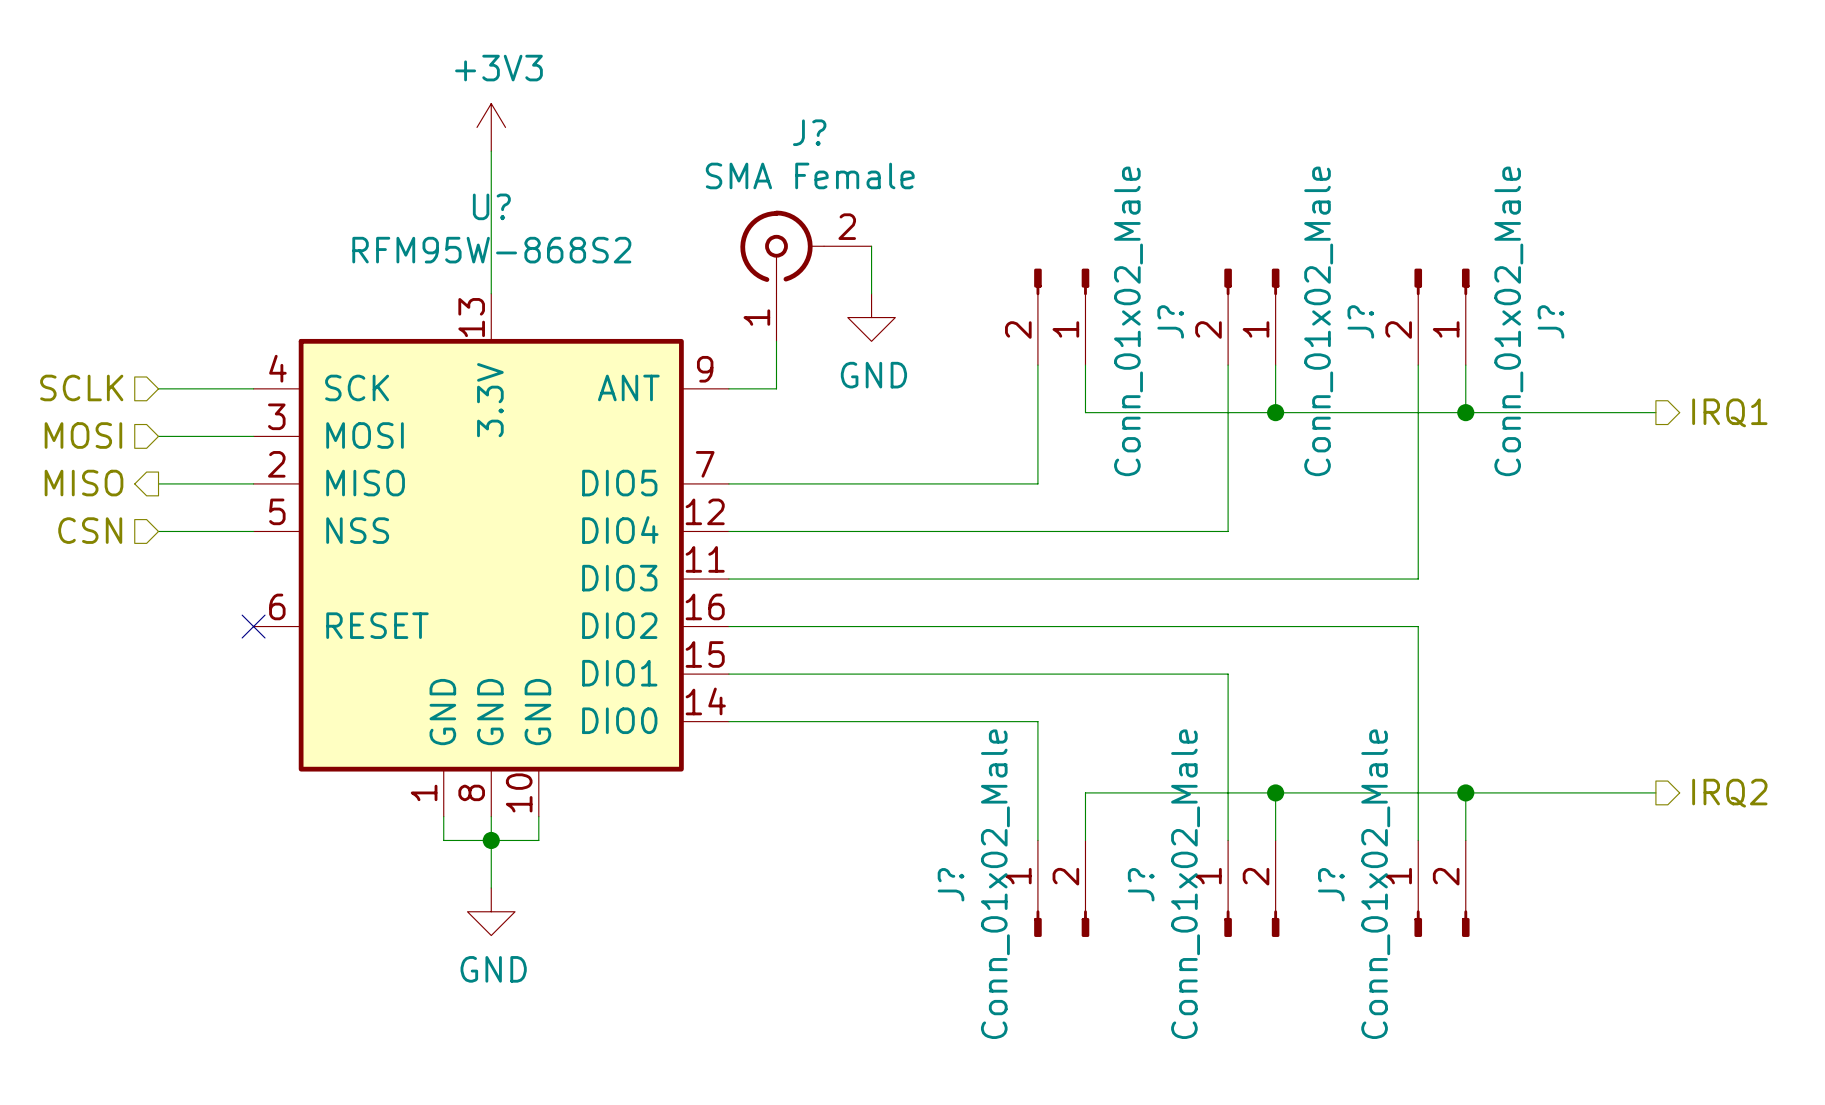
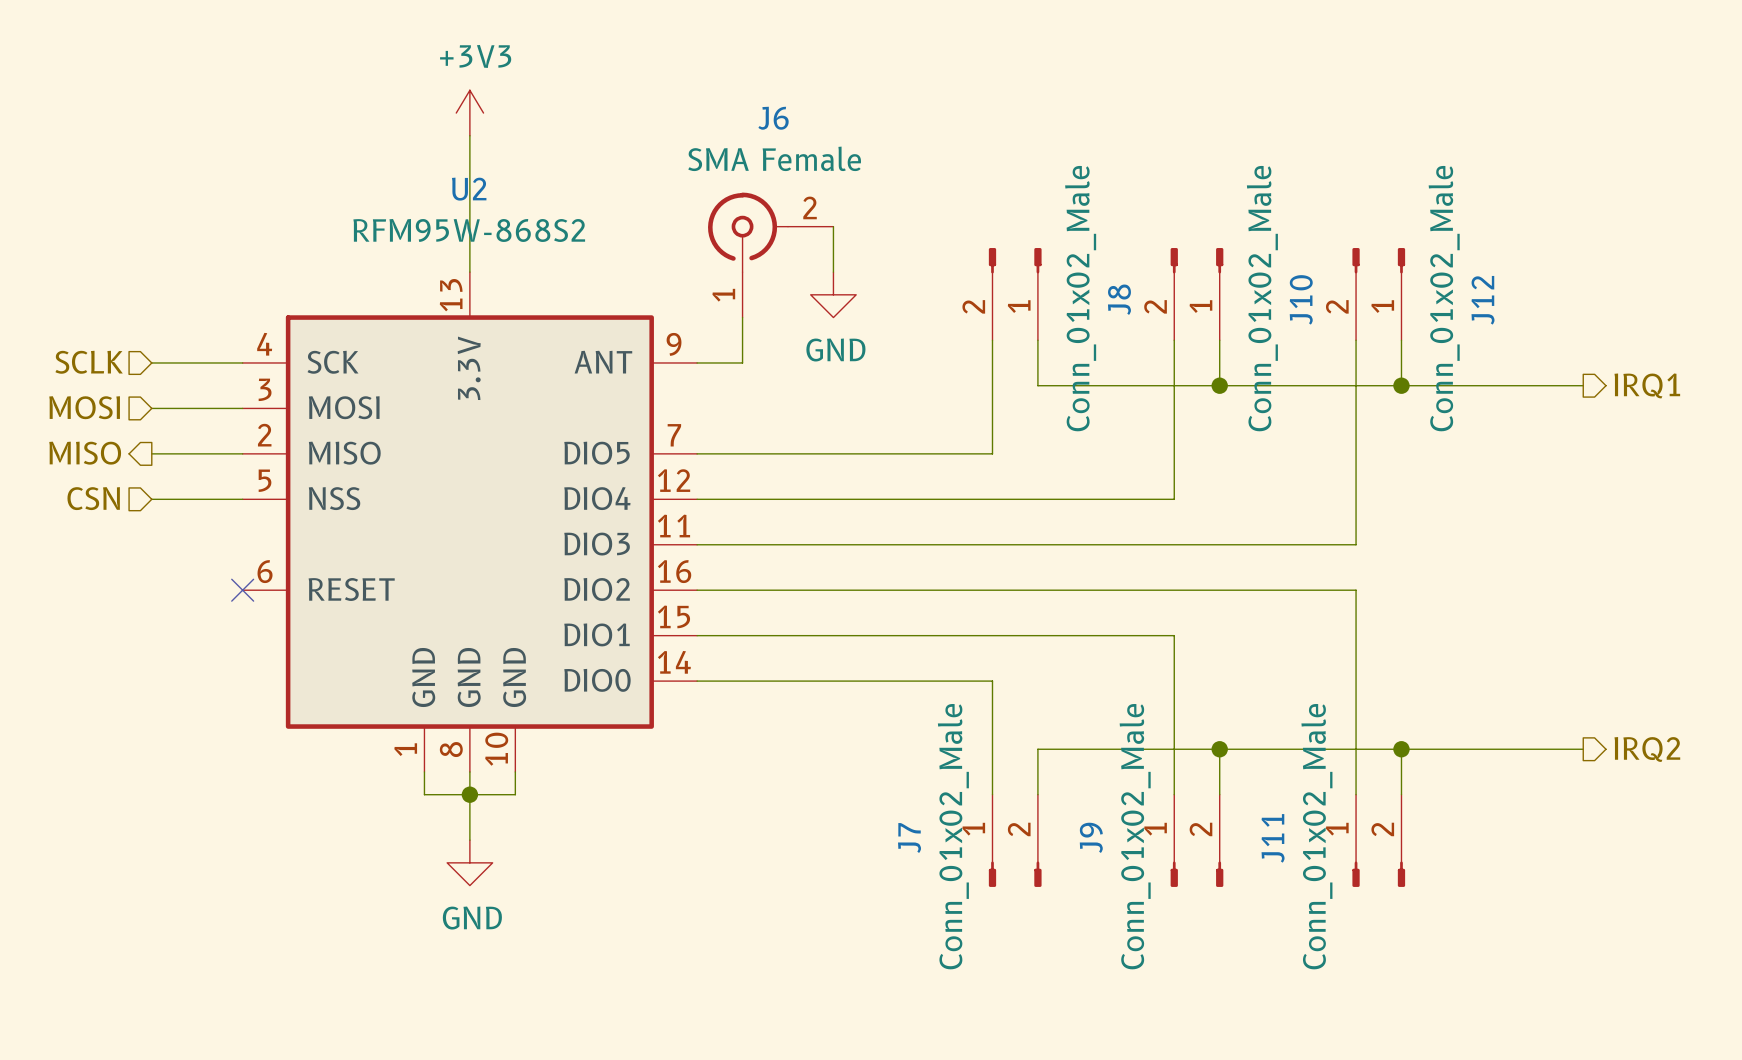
J? name: J? (809, 132) -> J6 (773, 118)
U? name: U? (491, 206) -> U2 (469, 189)
J? name: J? (1170, 321) -> J8 (1119, 299)
J? name: J? (1360, 321) -> J10 (1301, 299)
J? name: J? (1550, 321) -> J12 (1483, 300)
J? name: J? (951, 884) -> J7 (909, 838)
J? name: J? (1141, 884) -> J9 (1091, 837)
J? name: J? (1331, 884) -> J11 (1273, 838)

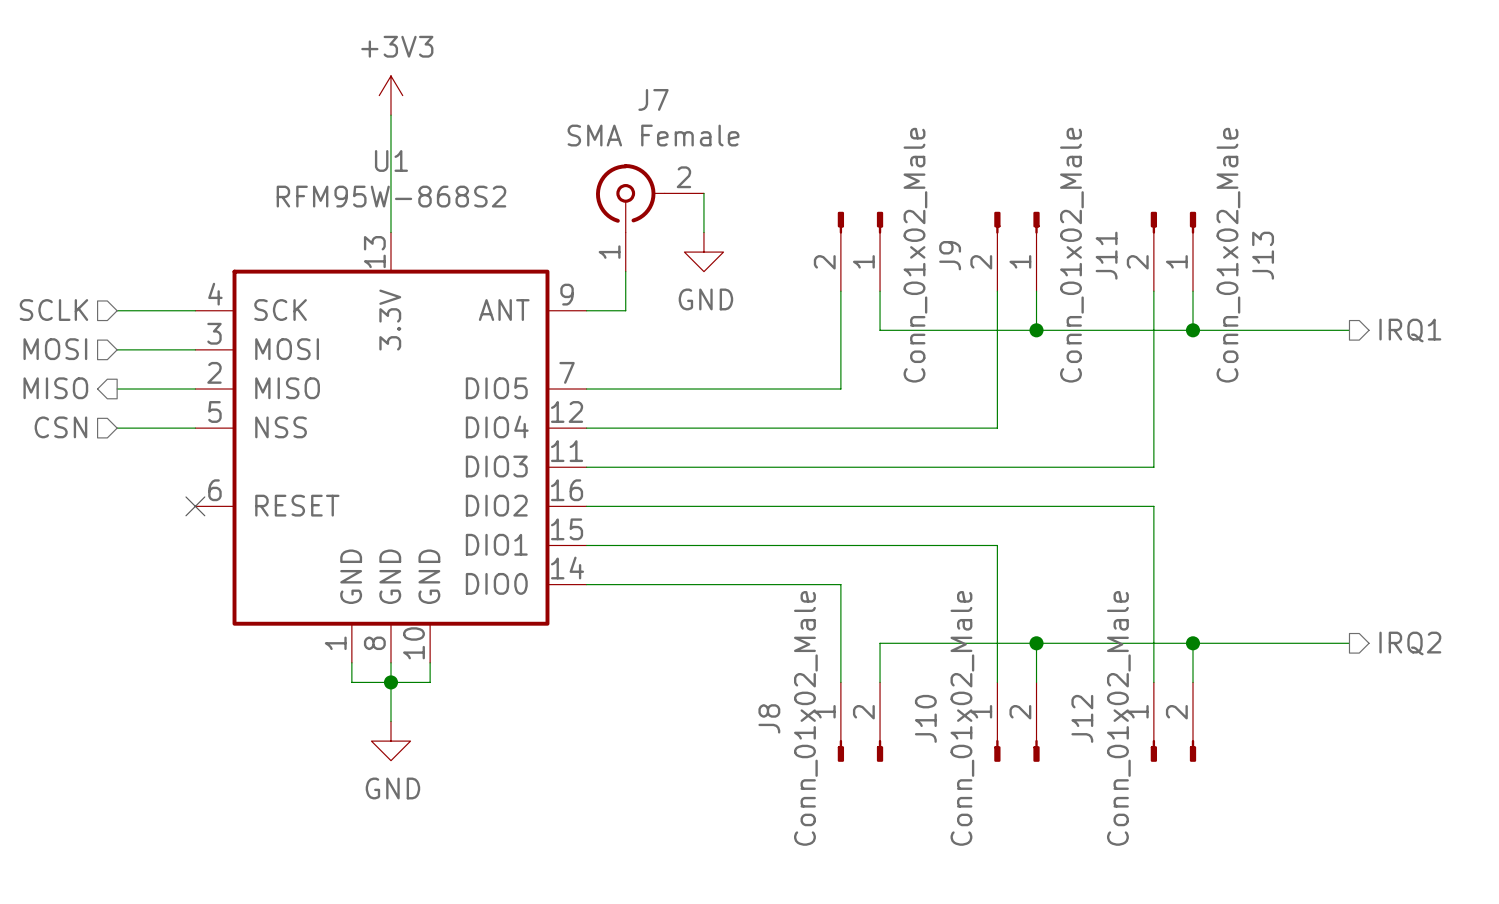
J6 name: J6 (773, 118) -> J7 (653, 99)
U2 name: U2 (469, 189) -> U1 (391, 160)
J8 name: J8 (1119, 299) -> J9 (950, 255)
J10 name: J10 (1301, 299) -> J11 (1106, 255)
J12 name: J12 (1483, 300) -> J13 (1263, 255)
J9 name: J9 (1091, 837) -> J10 (925, 718)
J7 name: J7 (909, 838) -> J8 (769, 718)
J11 name: J11 (1273, 838) -> J12 (1082, 718)

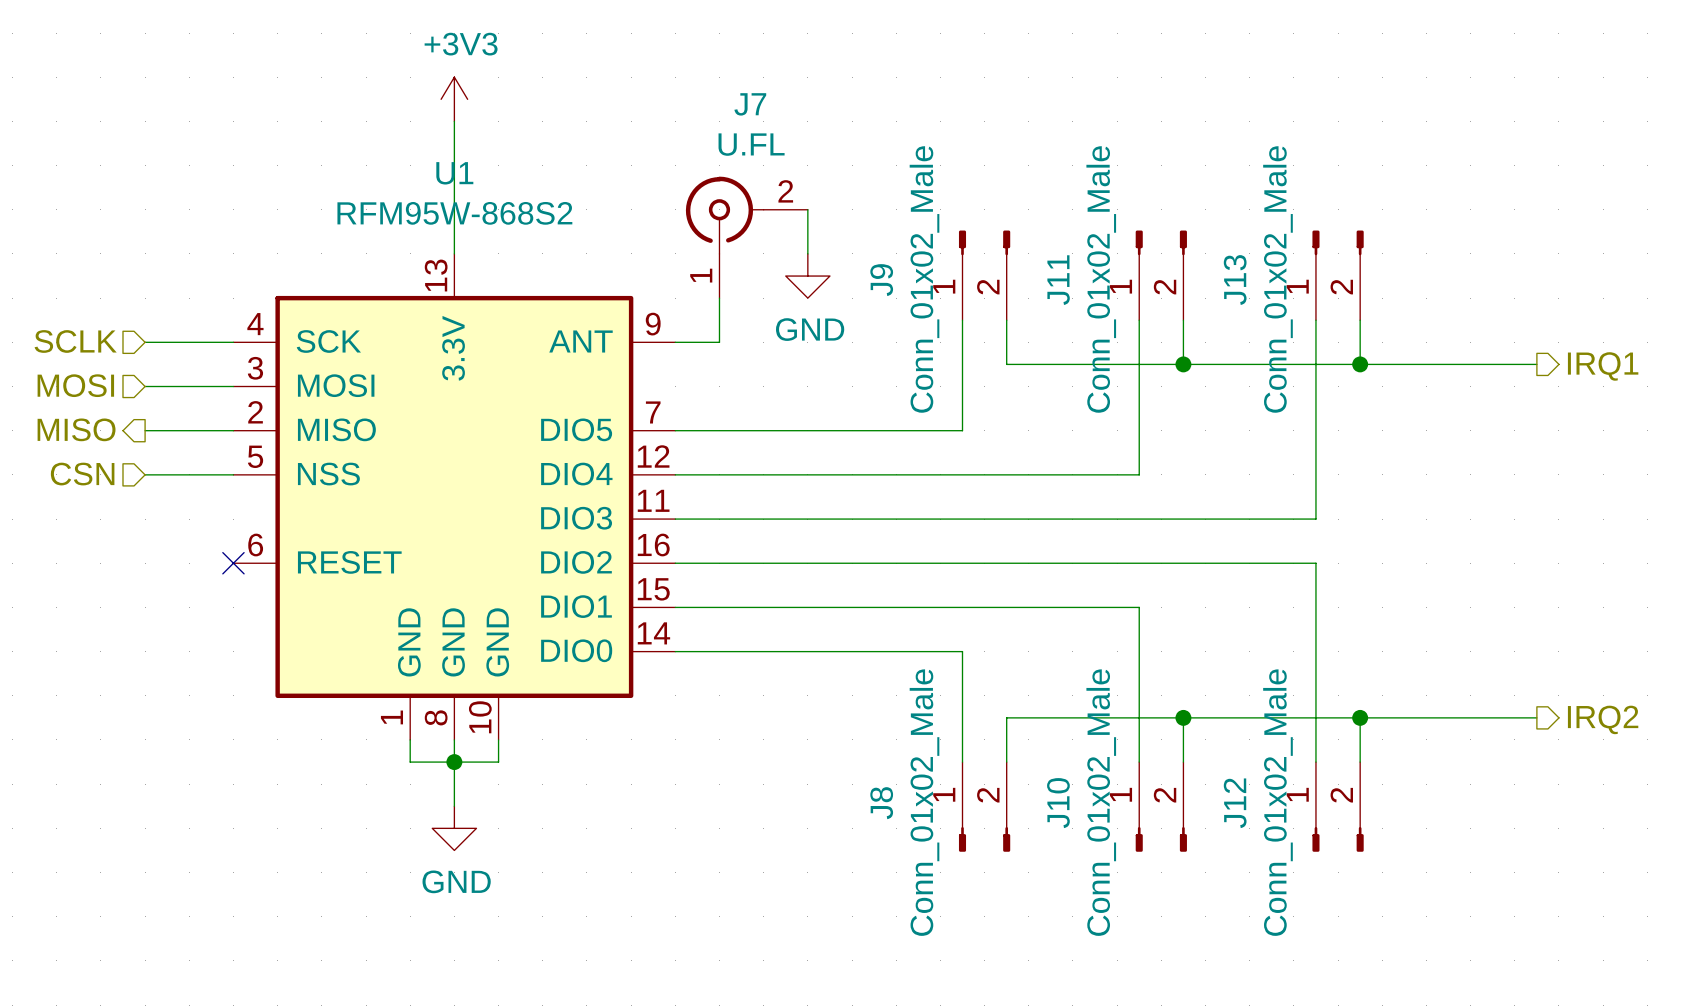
J7 value: SMA Female (653, 135) -> U.FL (751, 144)
J9 flip: as is (860, 222) -> left-right (984, 242)
J11 flip: as is (1016, 222) -> left-right (1161, 242)
J13 flip: as is (1173, 222) -> left-right (1338, 242)

